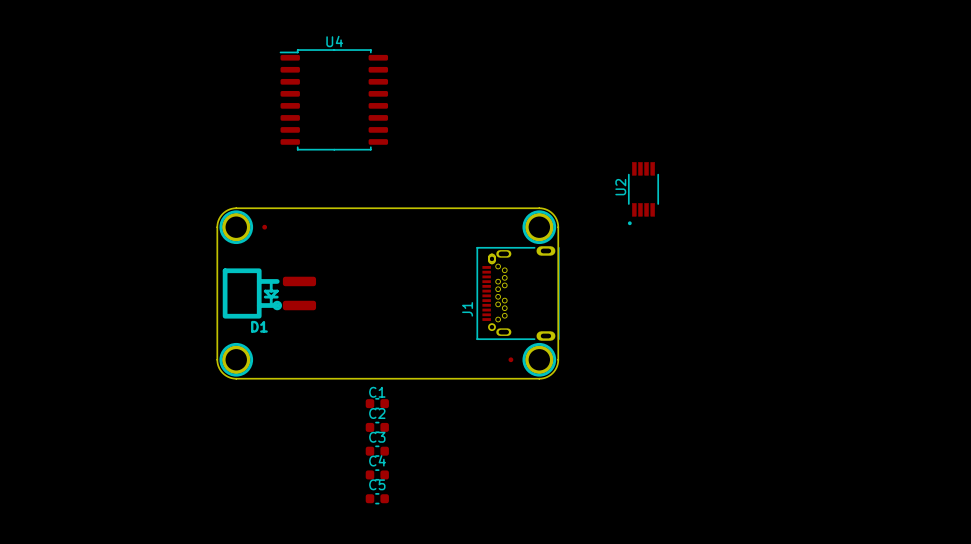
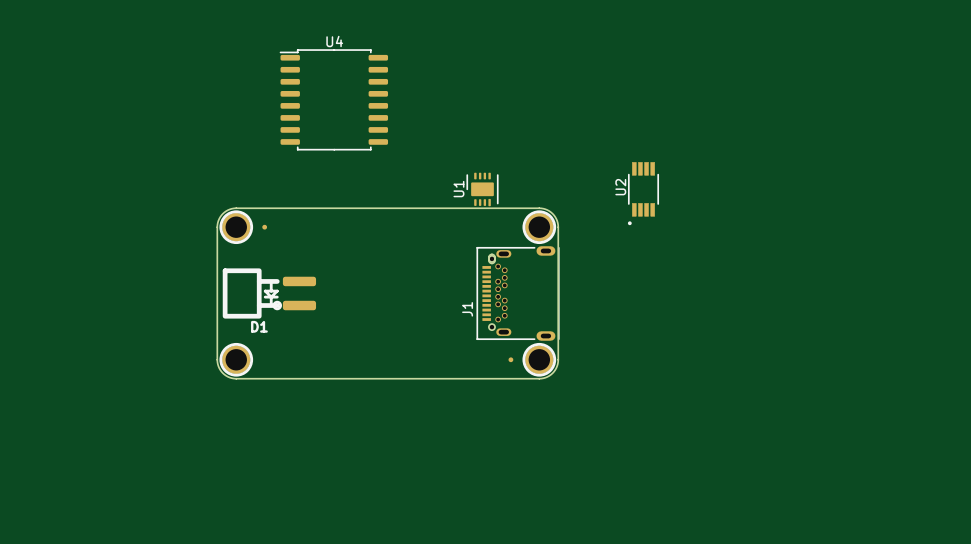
U1: none -> (482, 189)
C1: (377, 403) -> none
C2: (377, 427) -> none
C3: (377, 451) -> none
C4: (377, 474) -> none
C5: (377, 498) -> none

